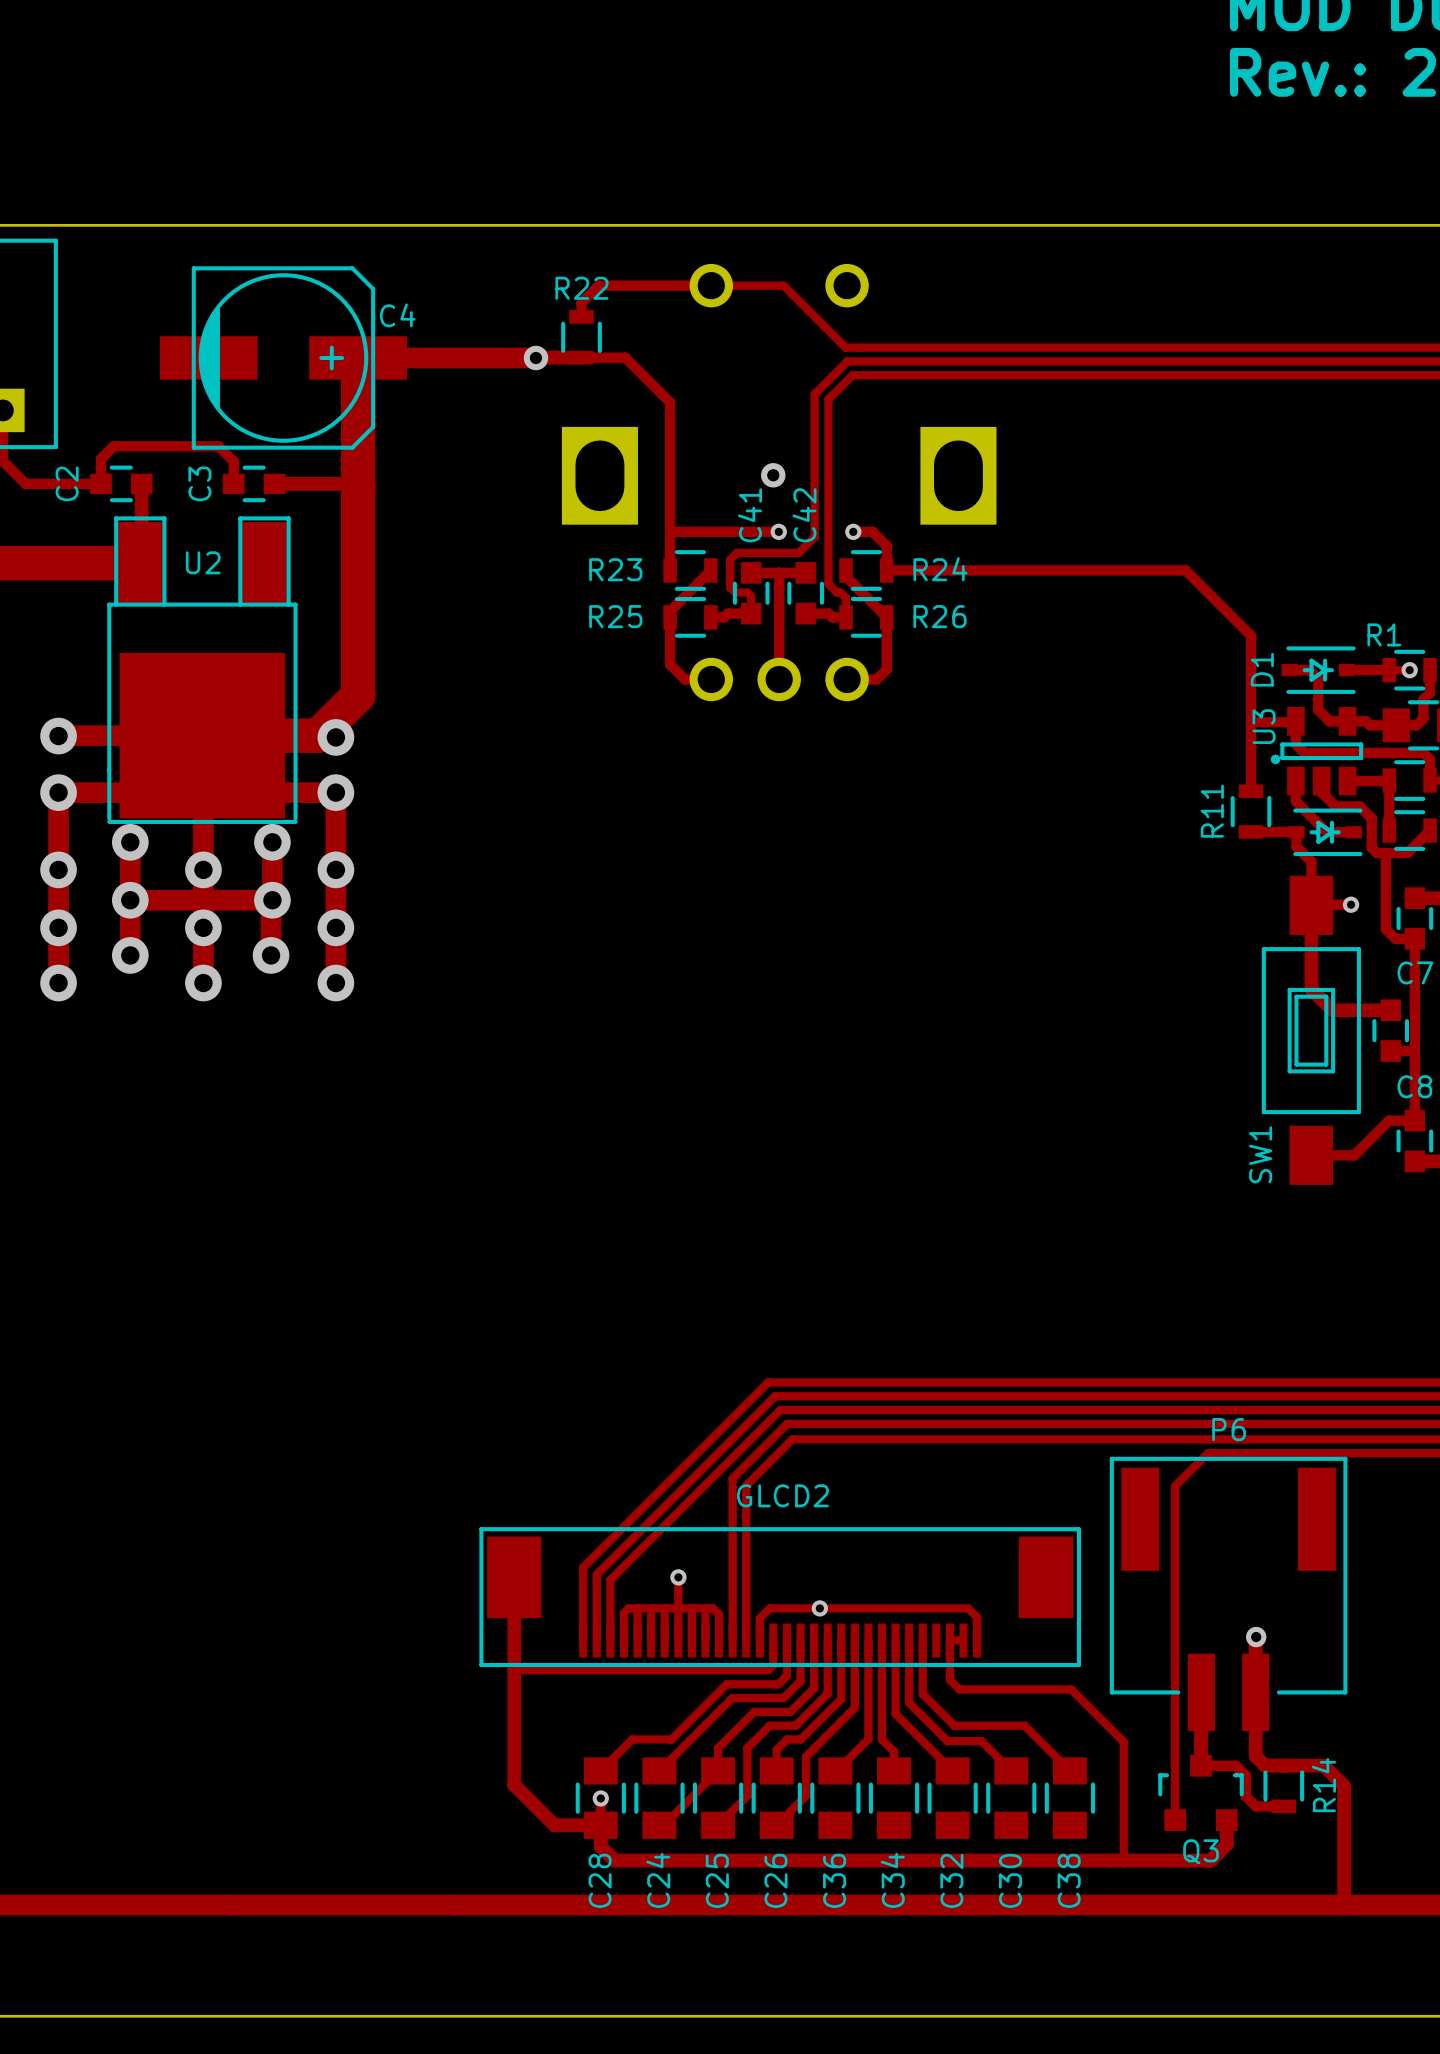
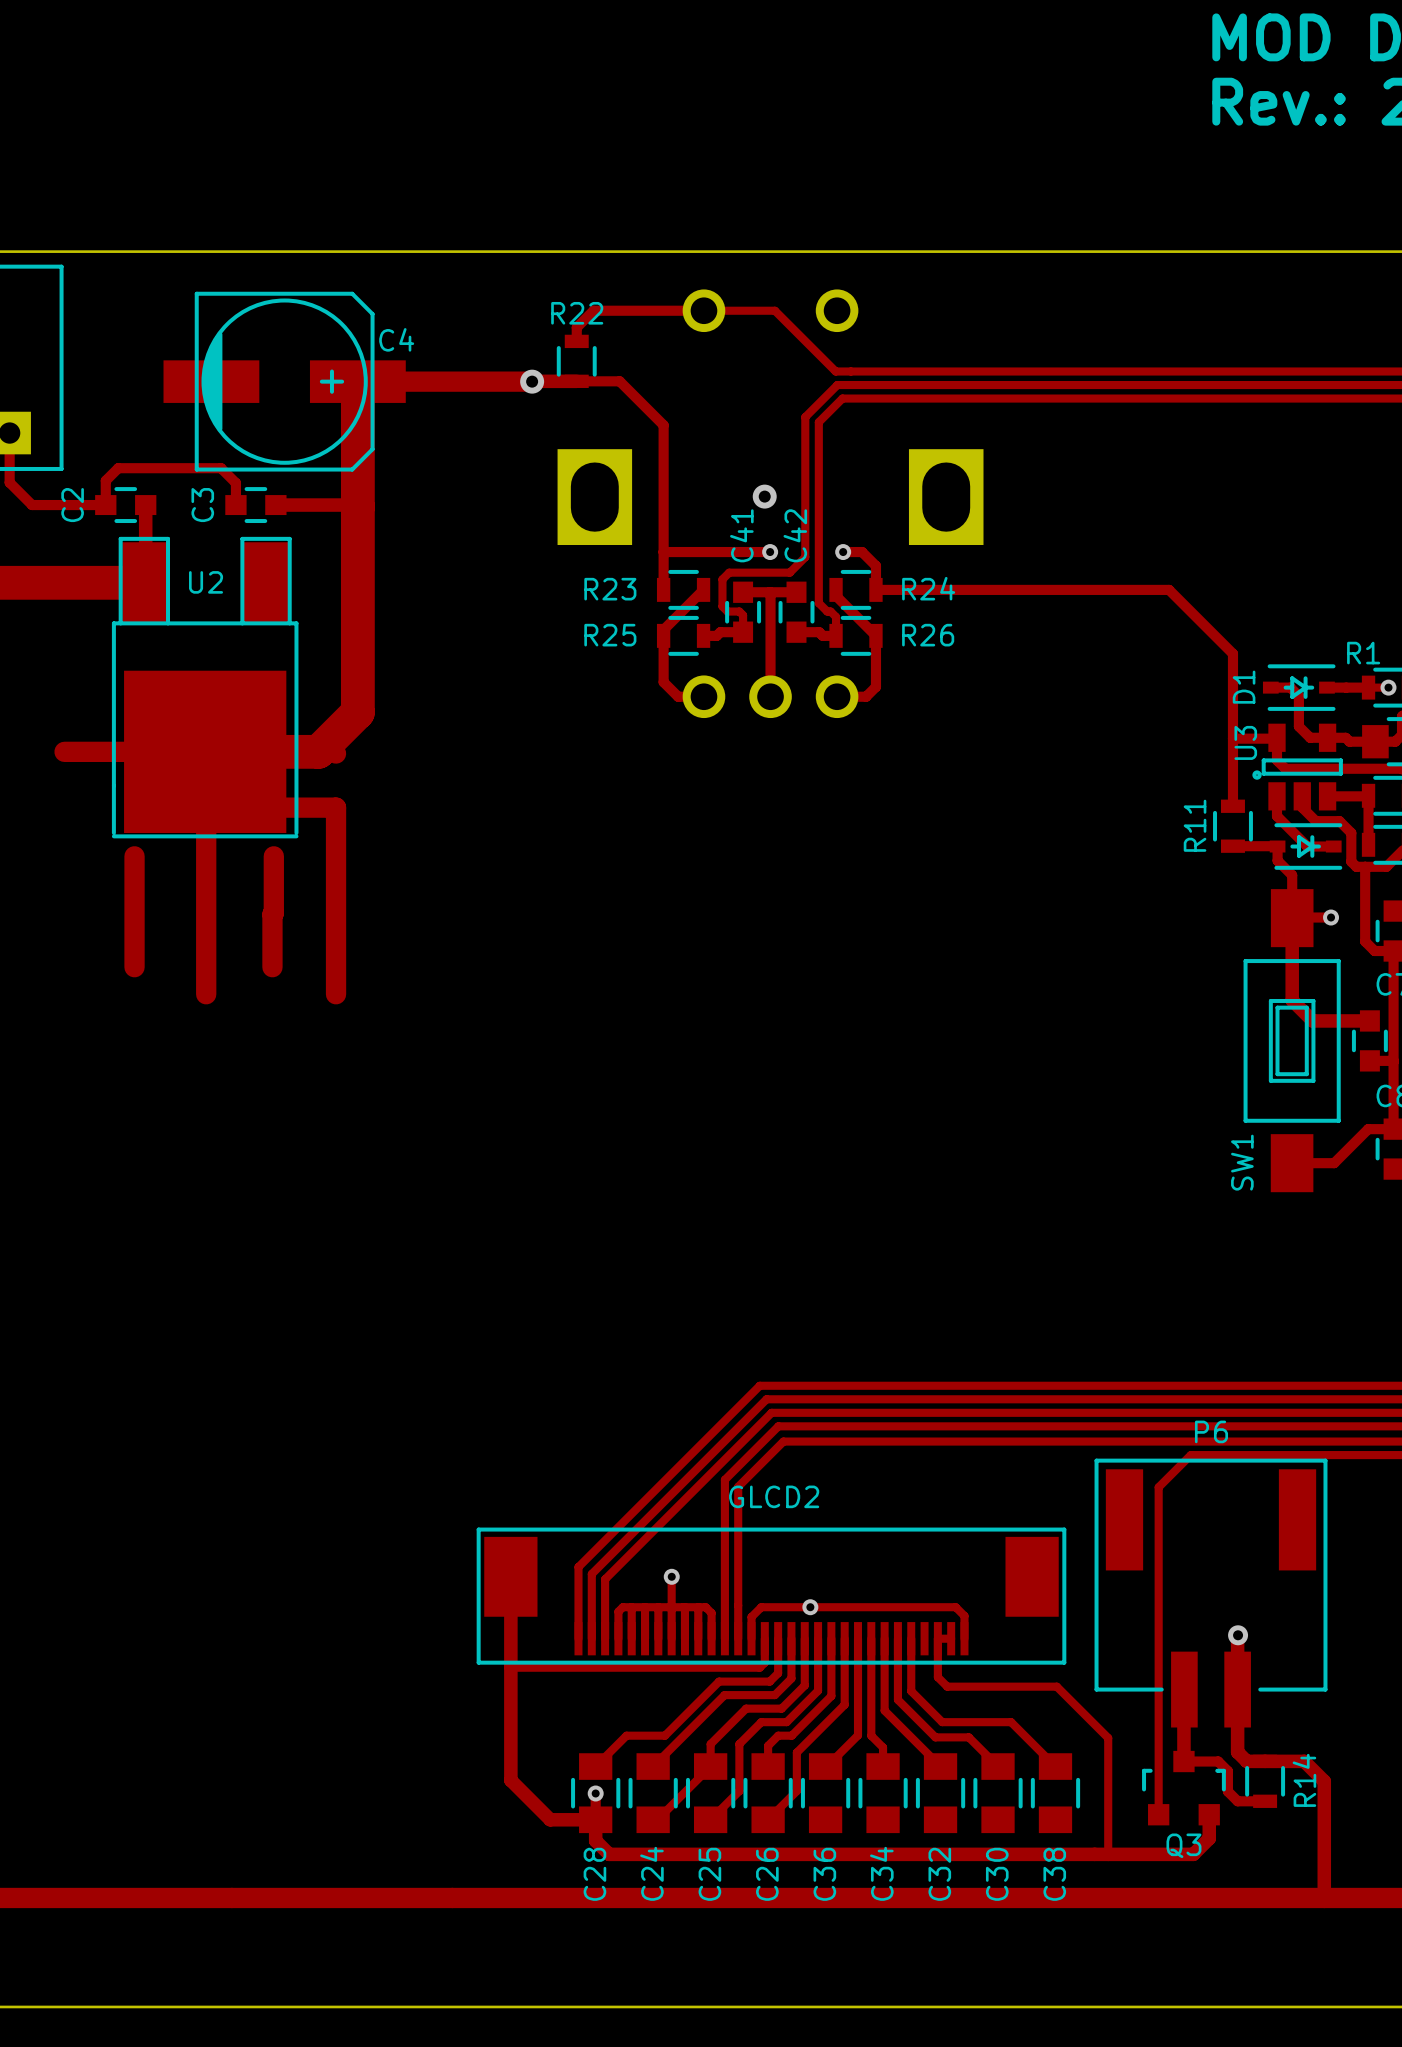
via: (58, 736) -> none
via: (335, 737) -> none
via: (58, 792) -> none
track: (145, 792) (58, 792) (58, 983) -> none
via: (335, 792) -> none
via: (130, 842) -> none
via: (272, 842) -> none
via: (58, 869) -> none
via: (203, 869) -> none
via: (335, 869) -> none
track: (130, 900) (272, 900) -> none
via: (130, 900) -> none
via: (272, 900) -> none
via: (58, 927) -> none
via: (203, 927) -> none
via: (335, 927) -> none
via: (130, 955) -> none
via: (271, 955) -> none
via: (58, 983) -> none
via: (203, 983) -> none
via: (335, 983) -> none

